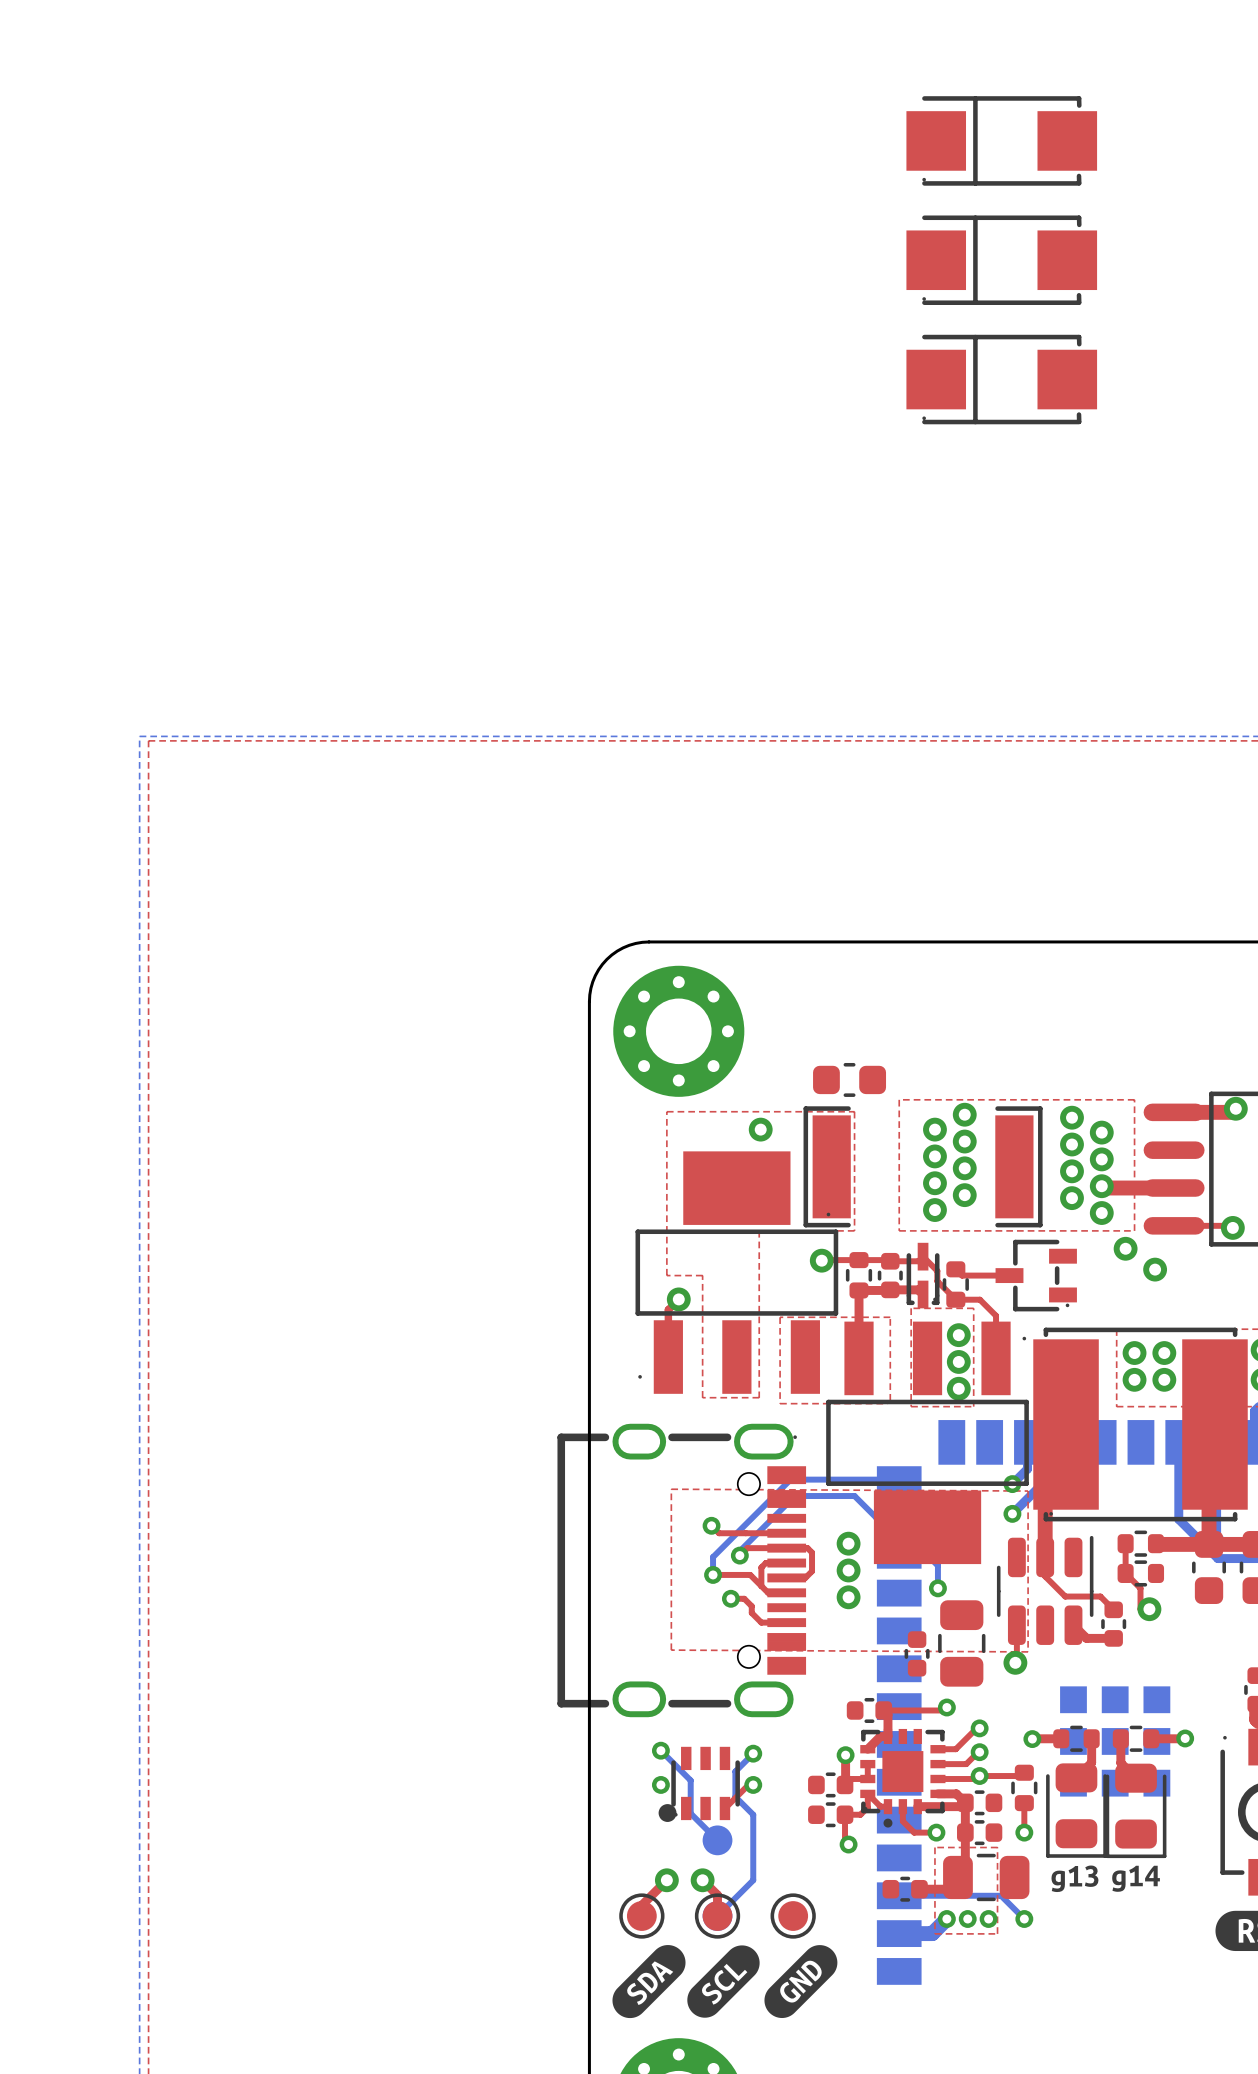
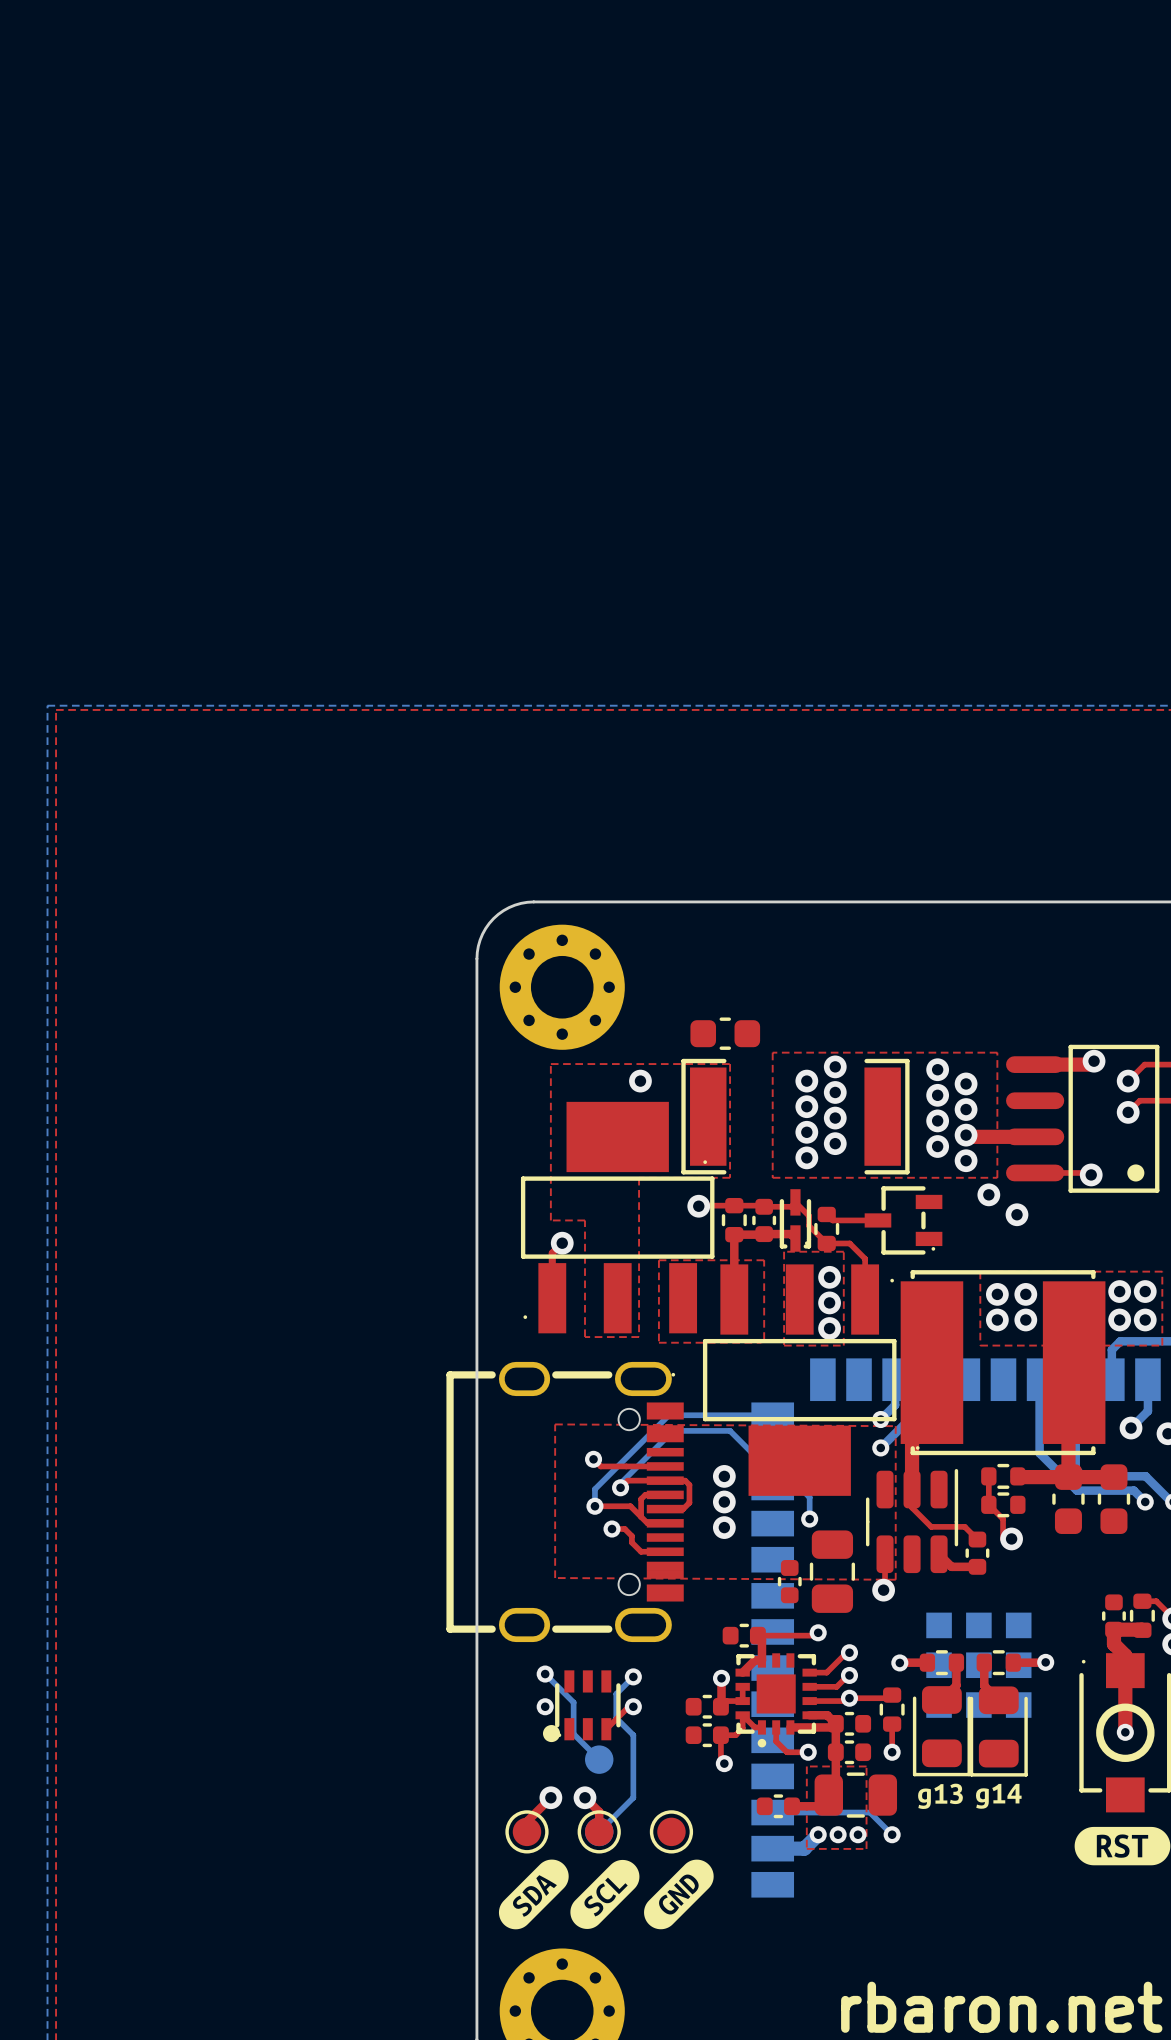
part: (1001, 140) -> none
part: (1001, 260) -> none
part: (1001, 379) -> none

